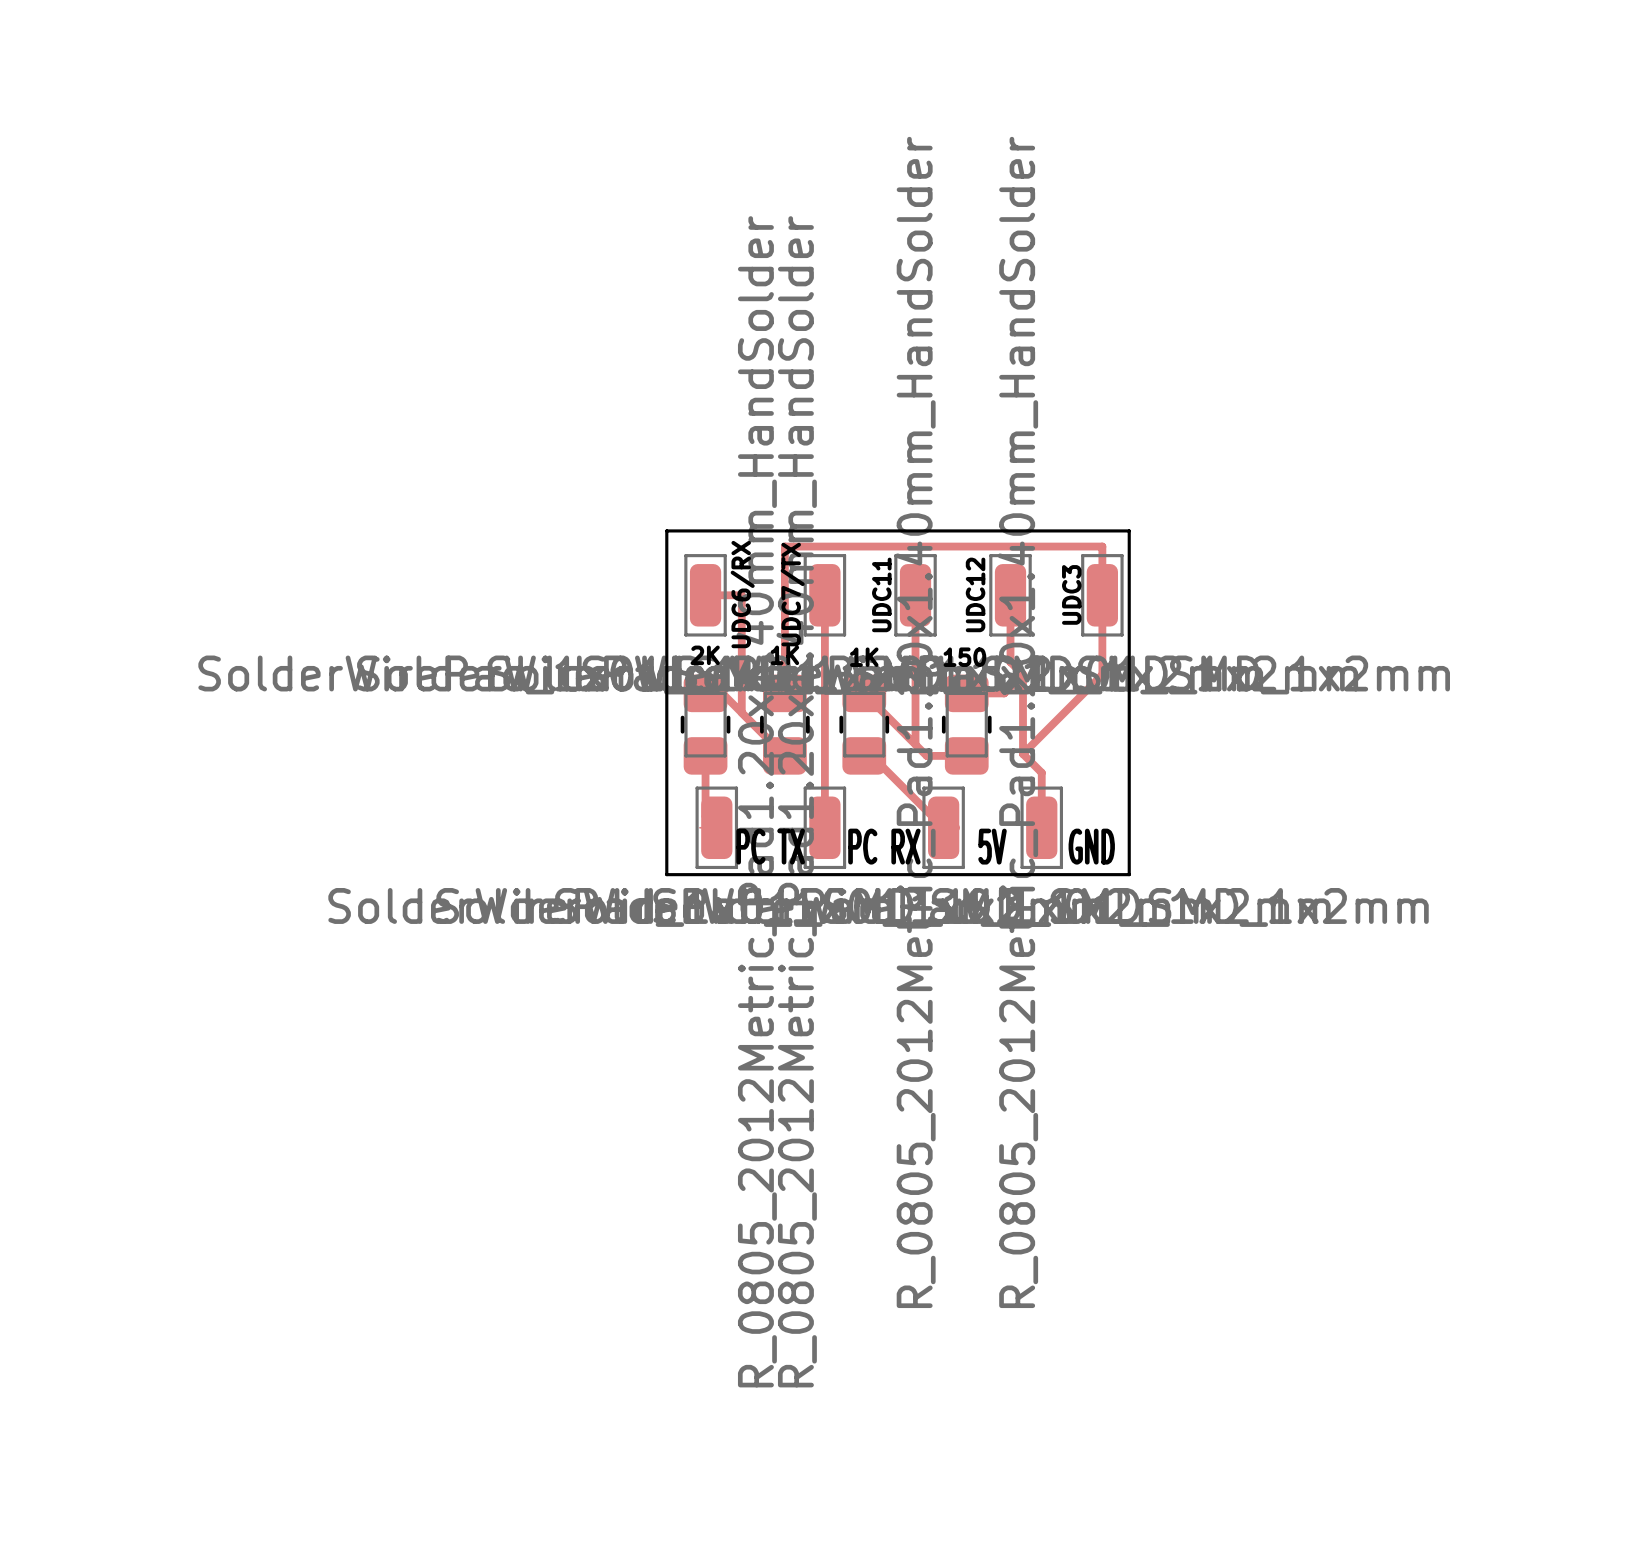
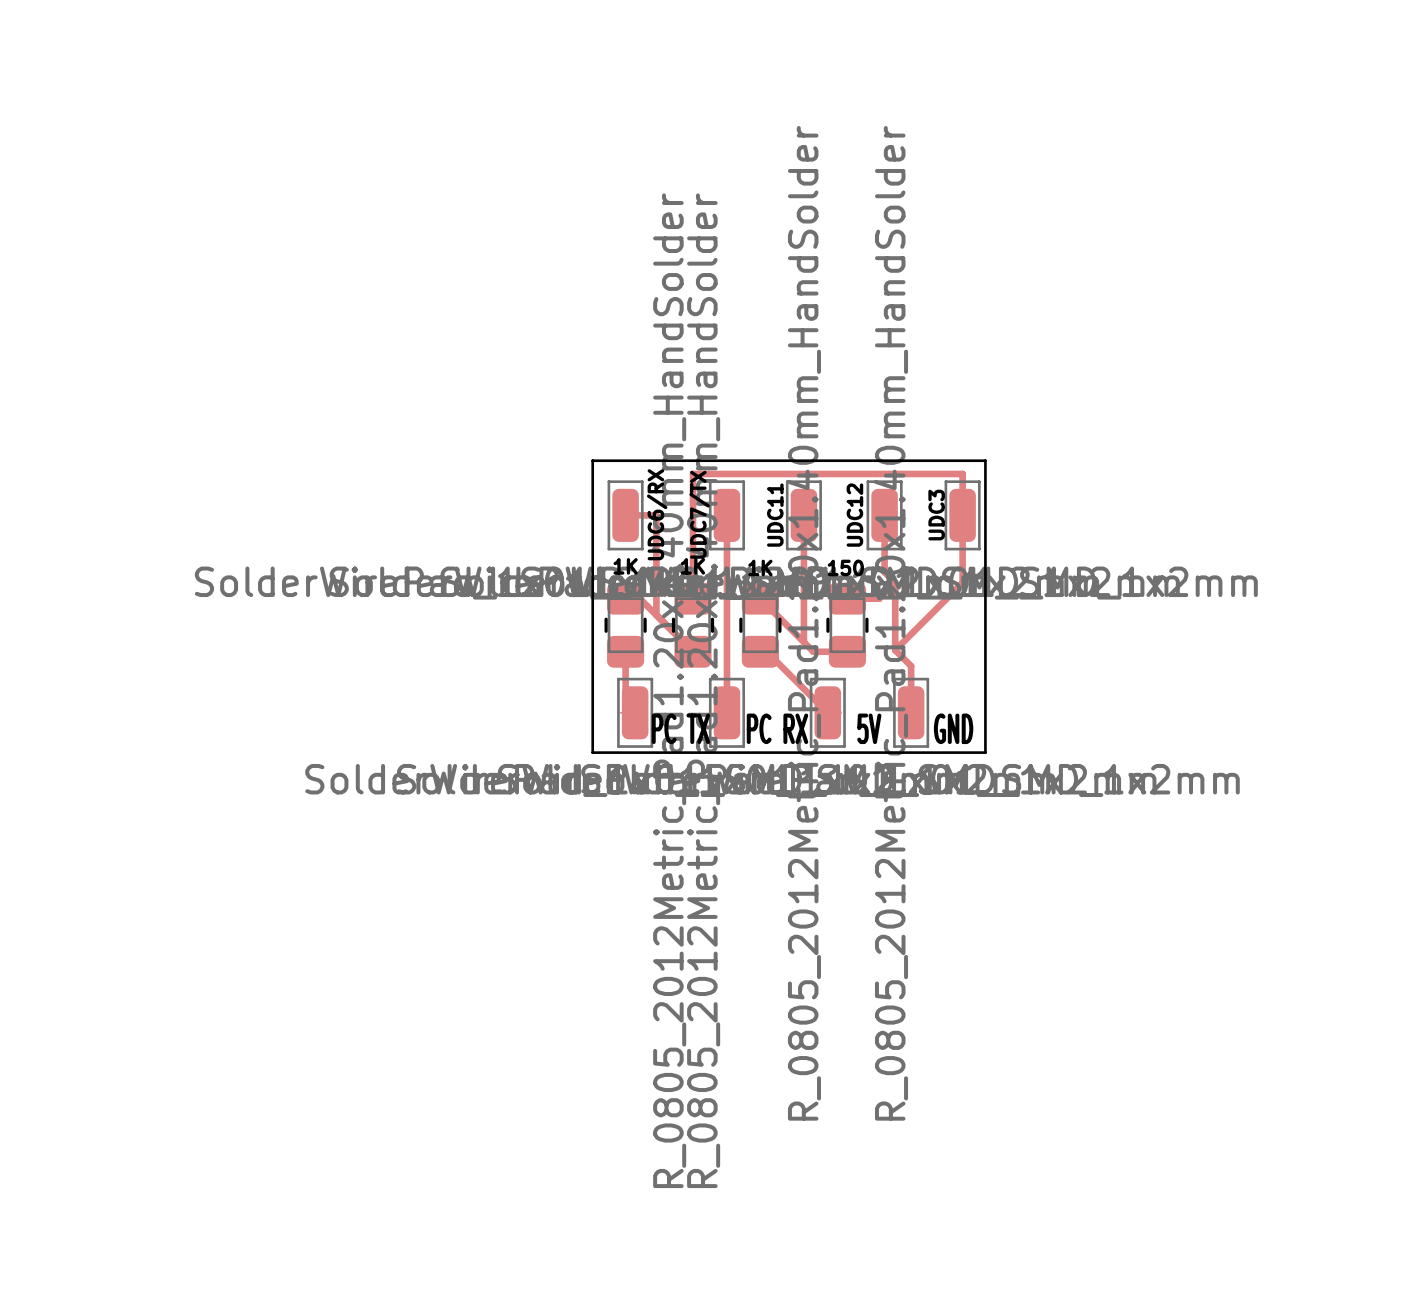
2K name: 2K (705, 655) -> 1K (625, 566)

